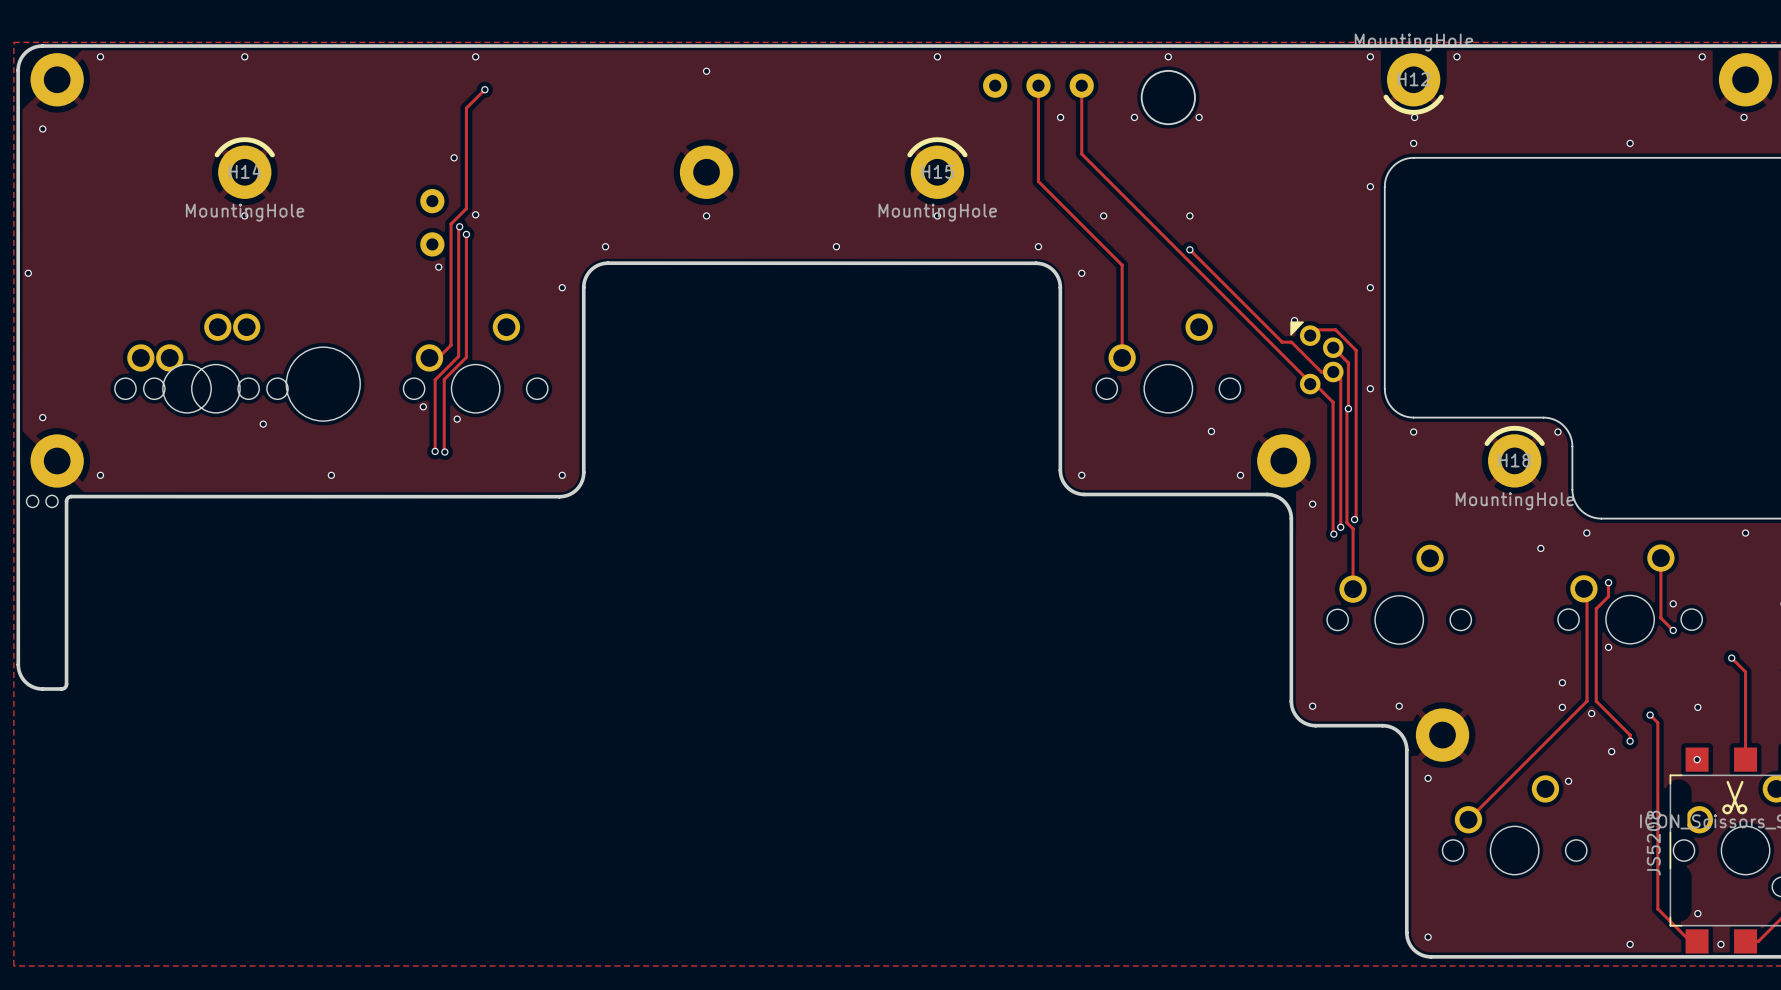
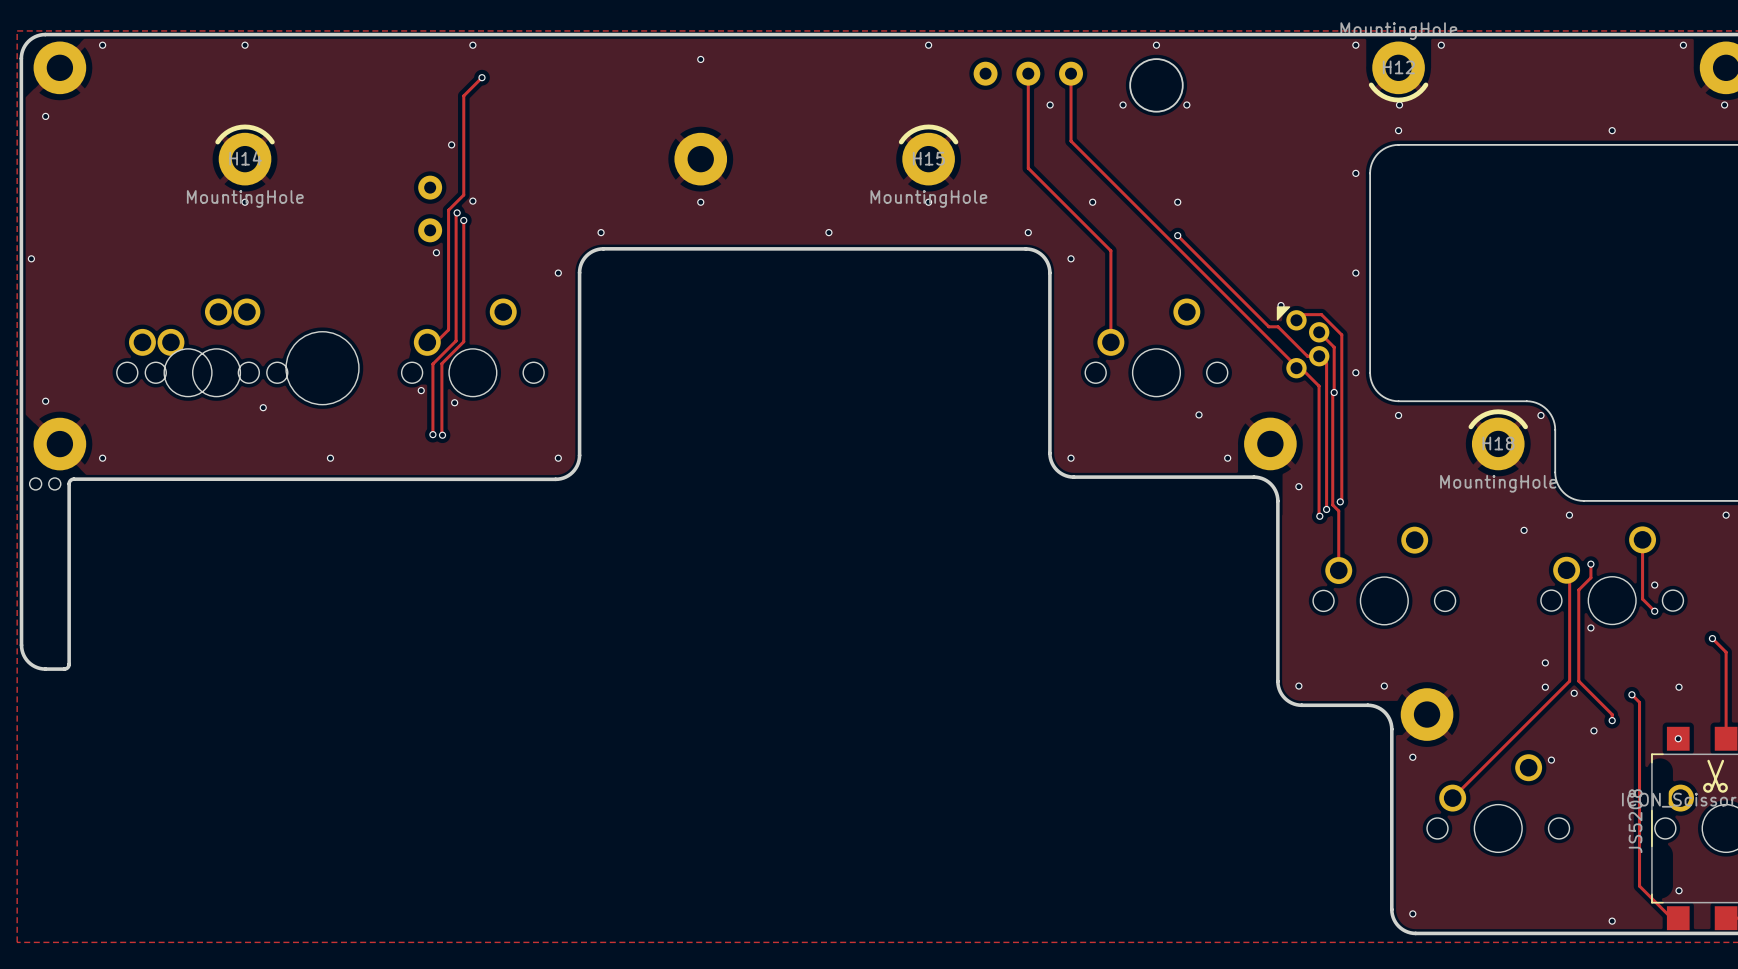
via: (1720, 944) -> none

